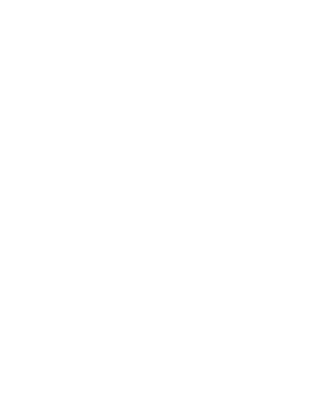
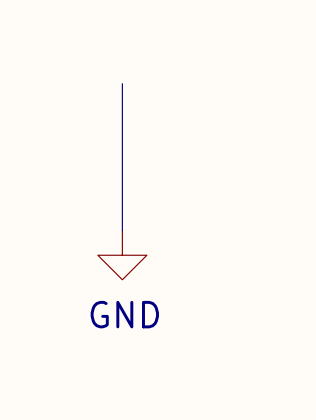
wire: none -> (122, 83) (122, 230)
power symbol: none -> GND (122, 255)

